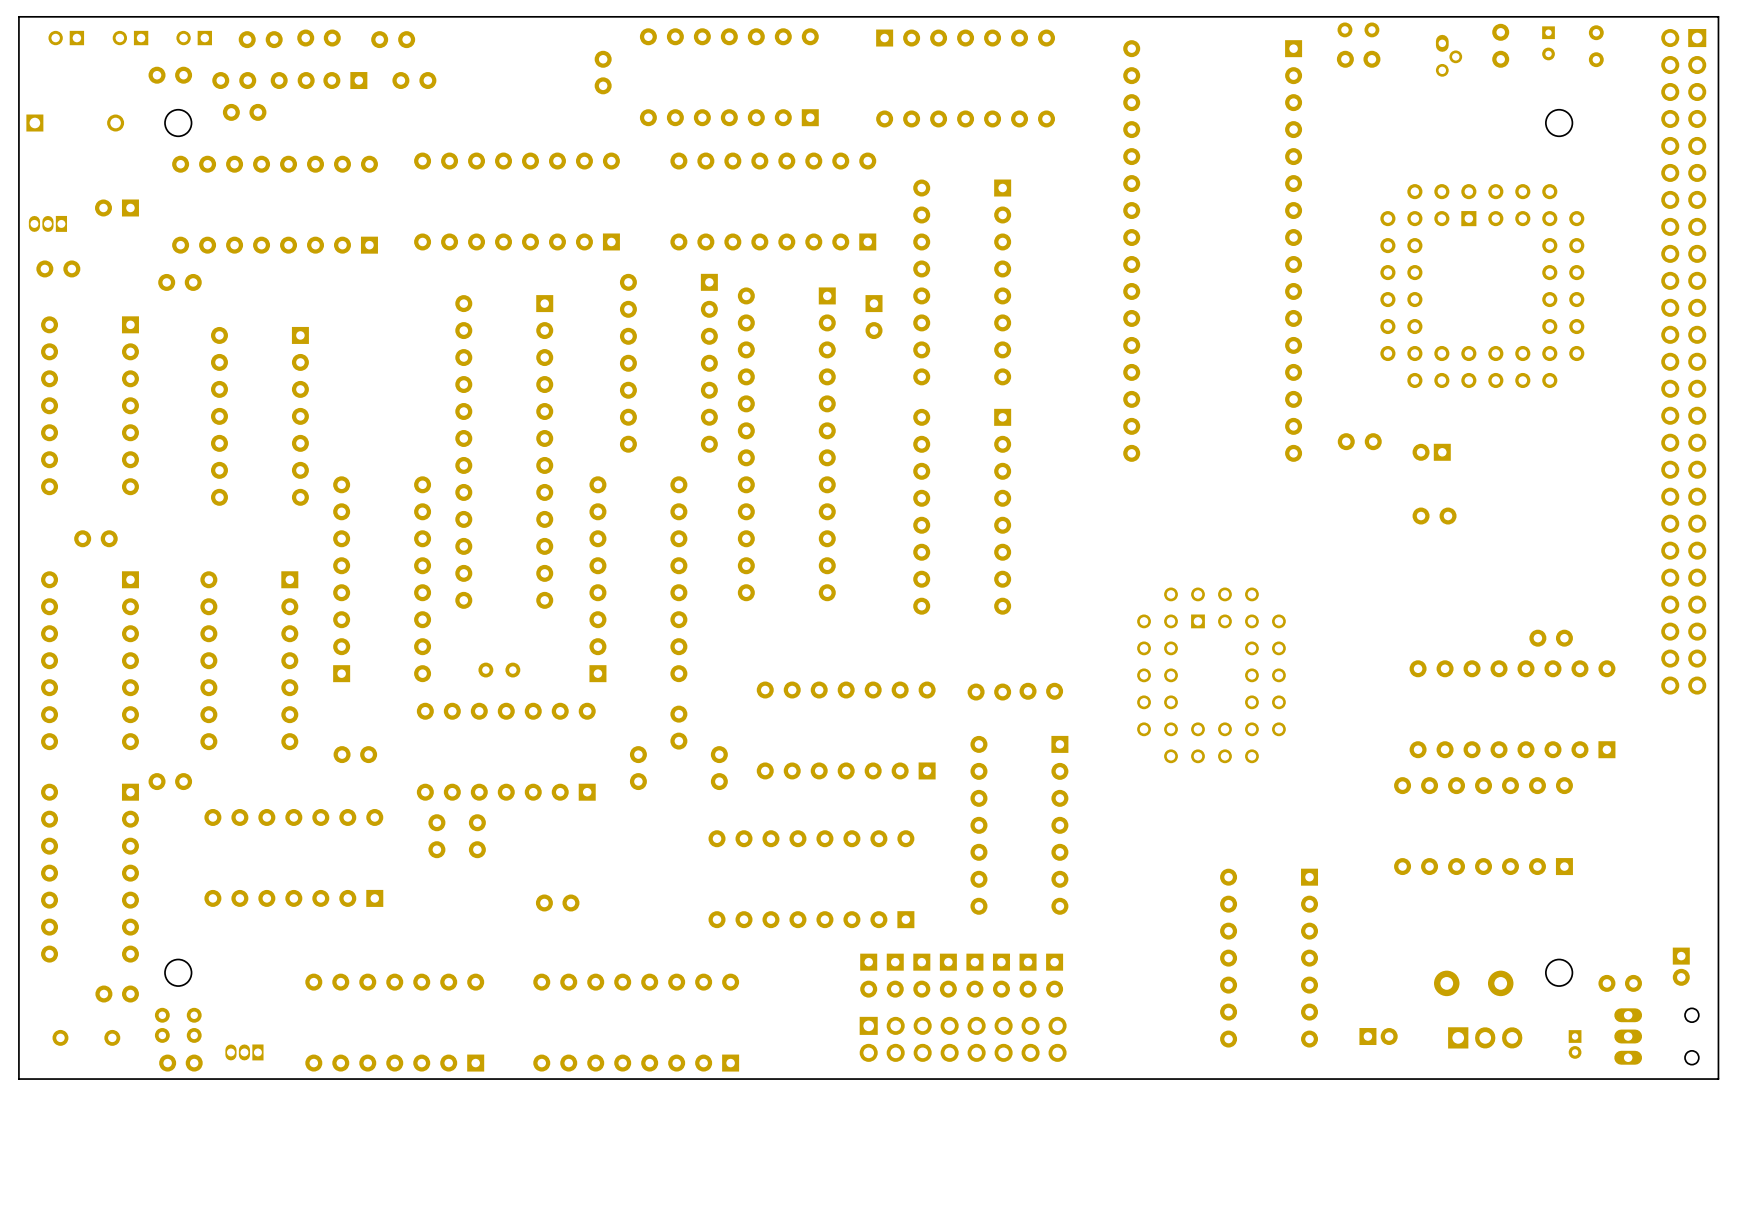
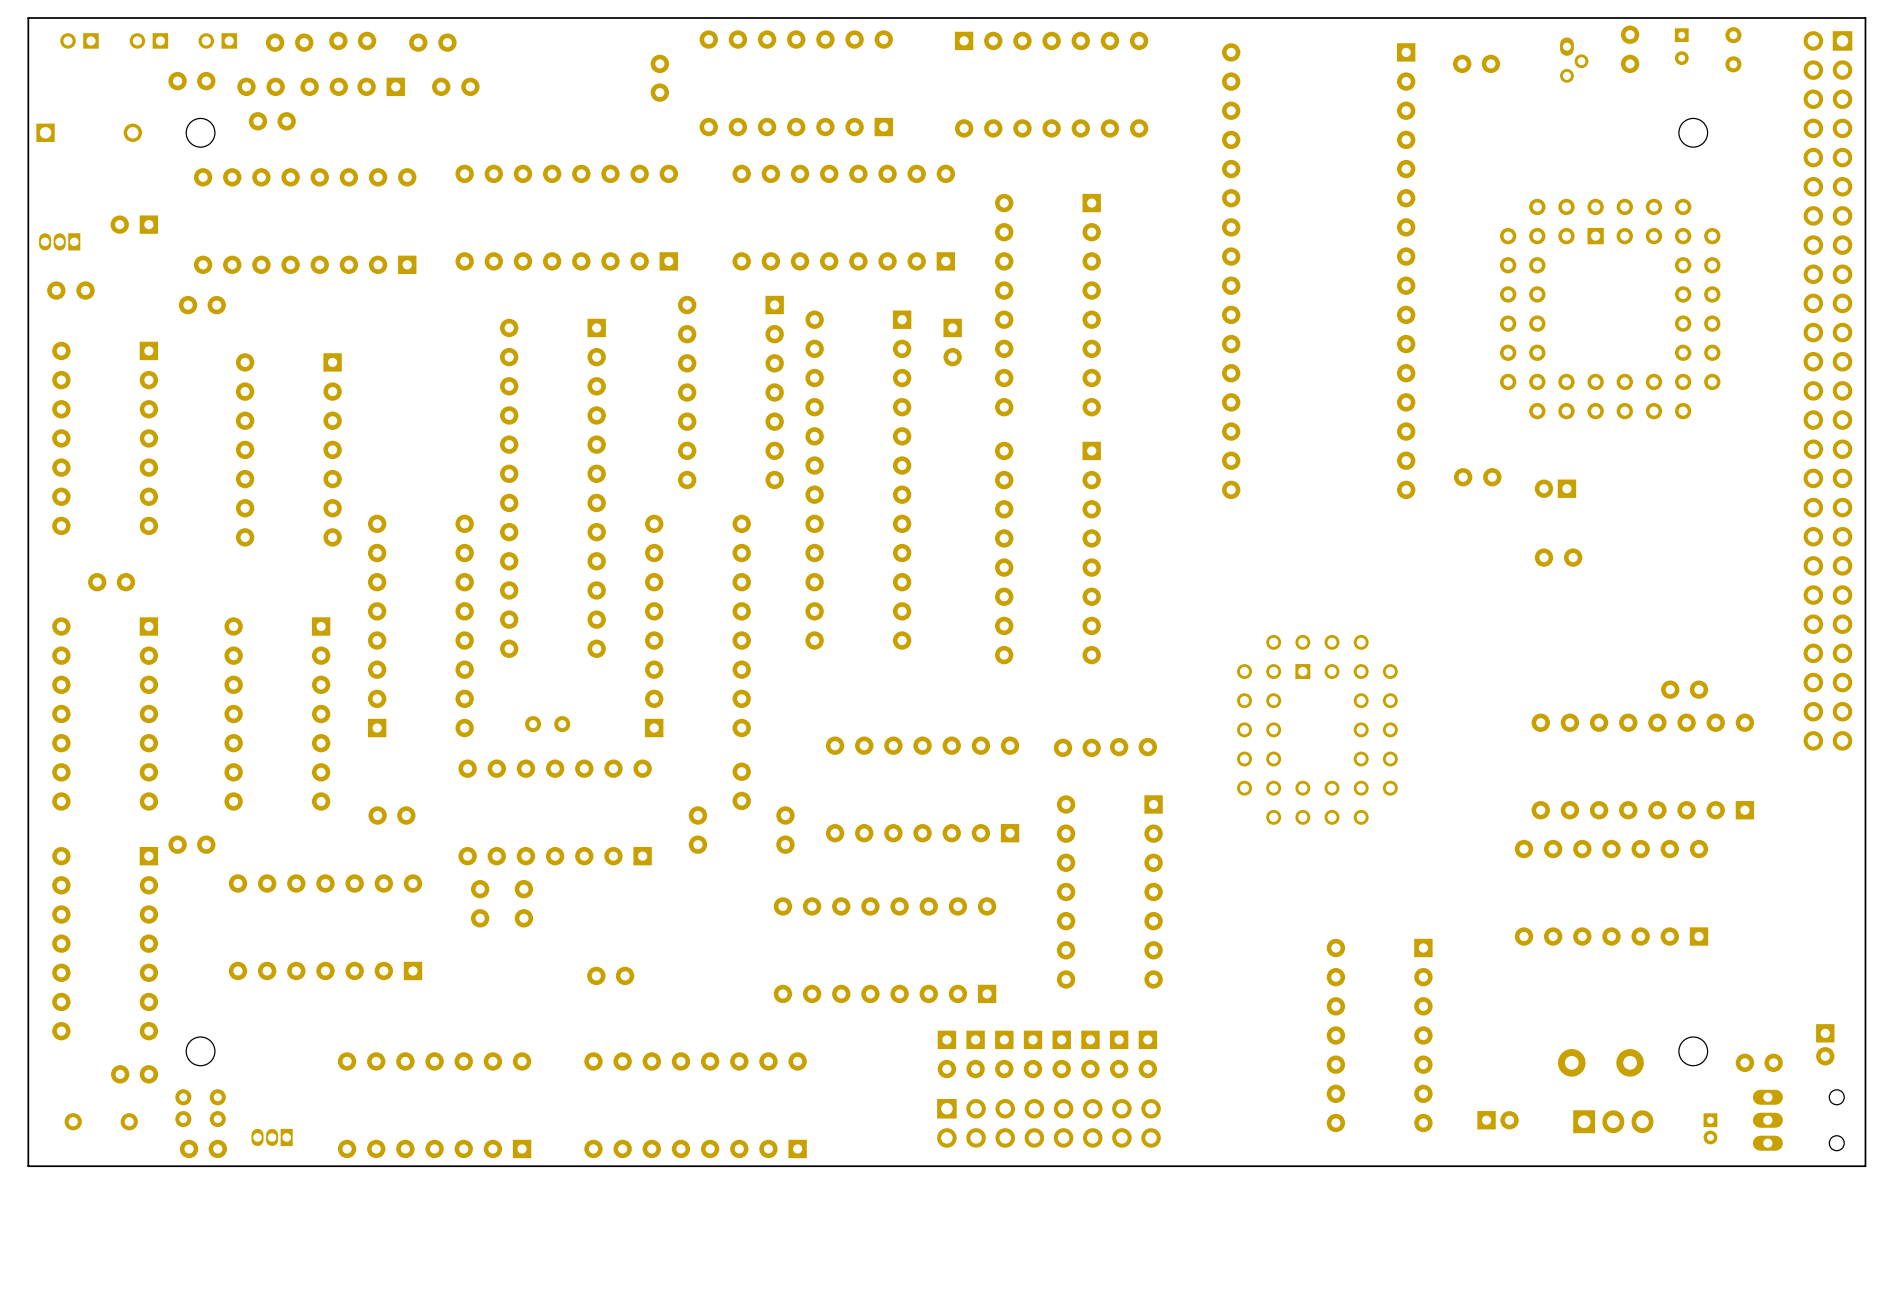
part: (1358, 29) -> none

